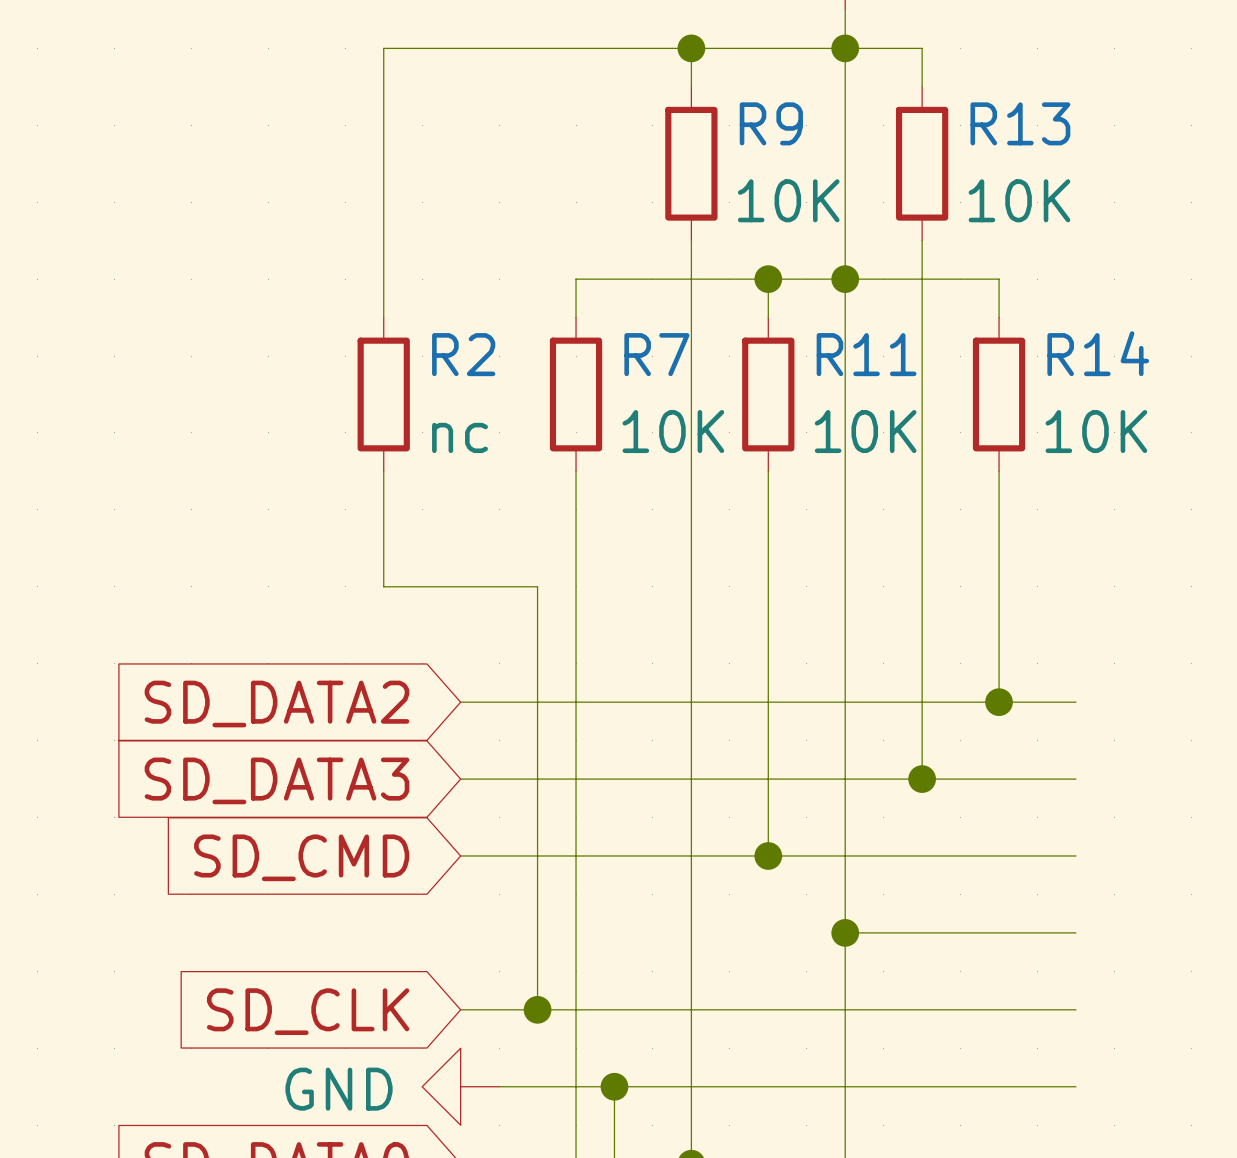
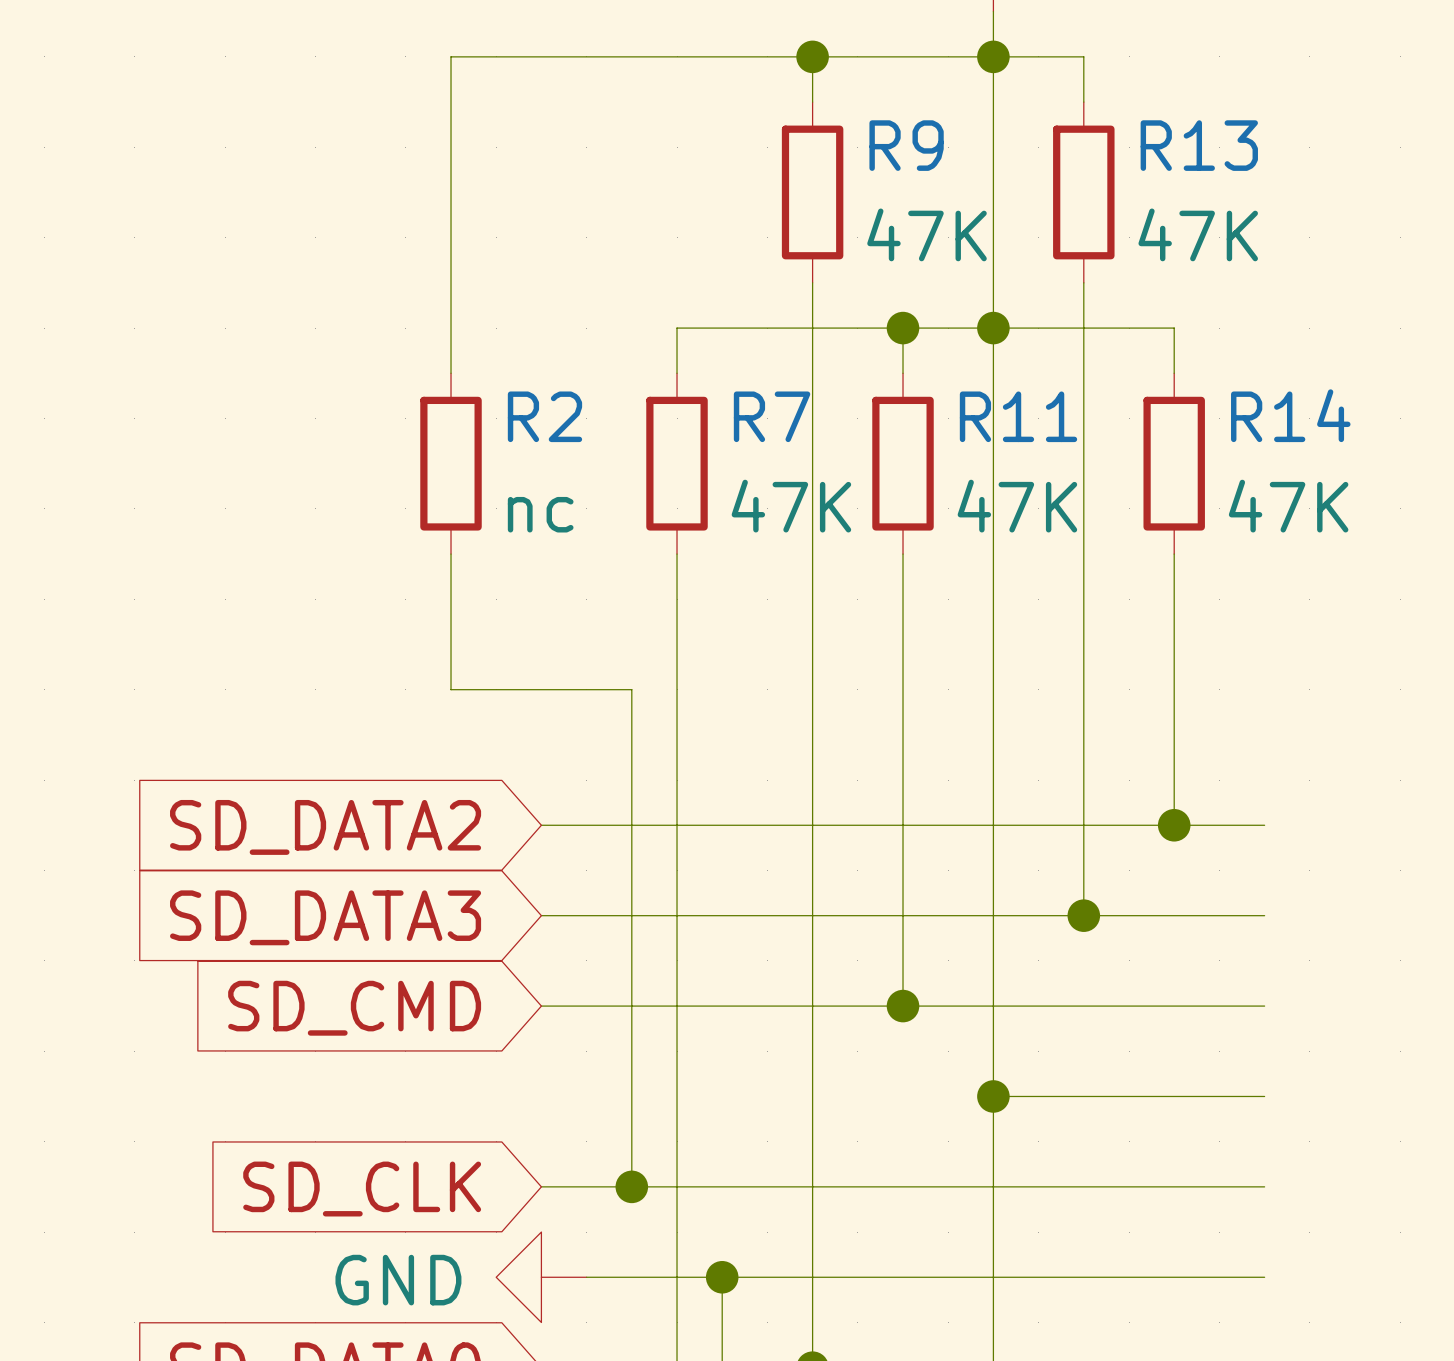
R9 value: 10K (788, 200) -> 47K (927, 234)
R13 value: 10K (1019, 200) -> 47K (1198, 234)
R7 value: 10K (673, 431) -> 47K (791, 506)
R11 value: 10K (865, 431) -> 47K (1017, 506)
R14 value: 10K (1096, 431) -> 47K (1288, 506)

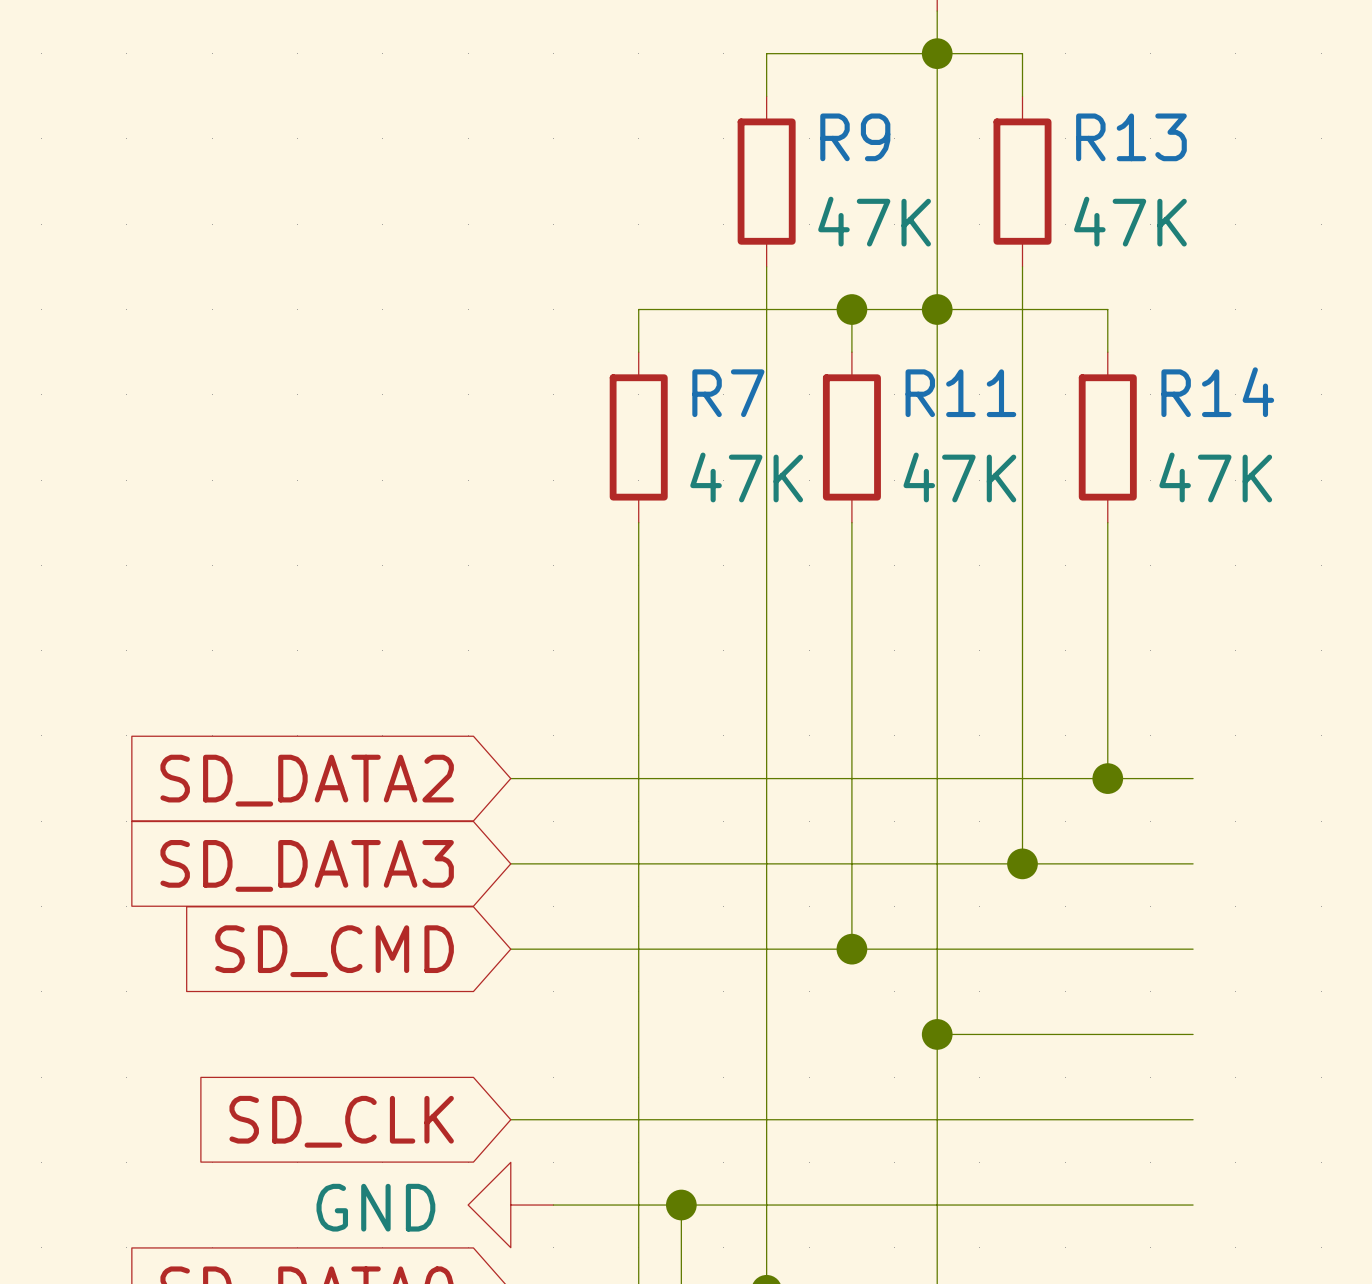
wire: (812, 56) (451, 56) (451, 373) -> none
junction: (812, 56) -> none
R2: nc (451, 463) -> none
wire: (451, 554) (451, 689) (631, 689) (631, 1186) -> none
junction: (631, 1186) -> none

